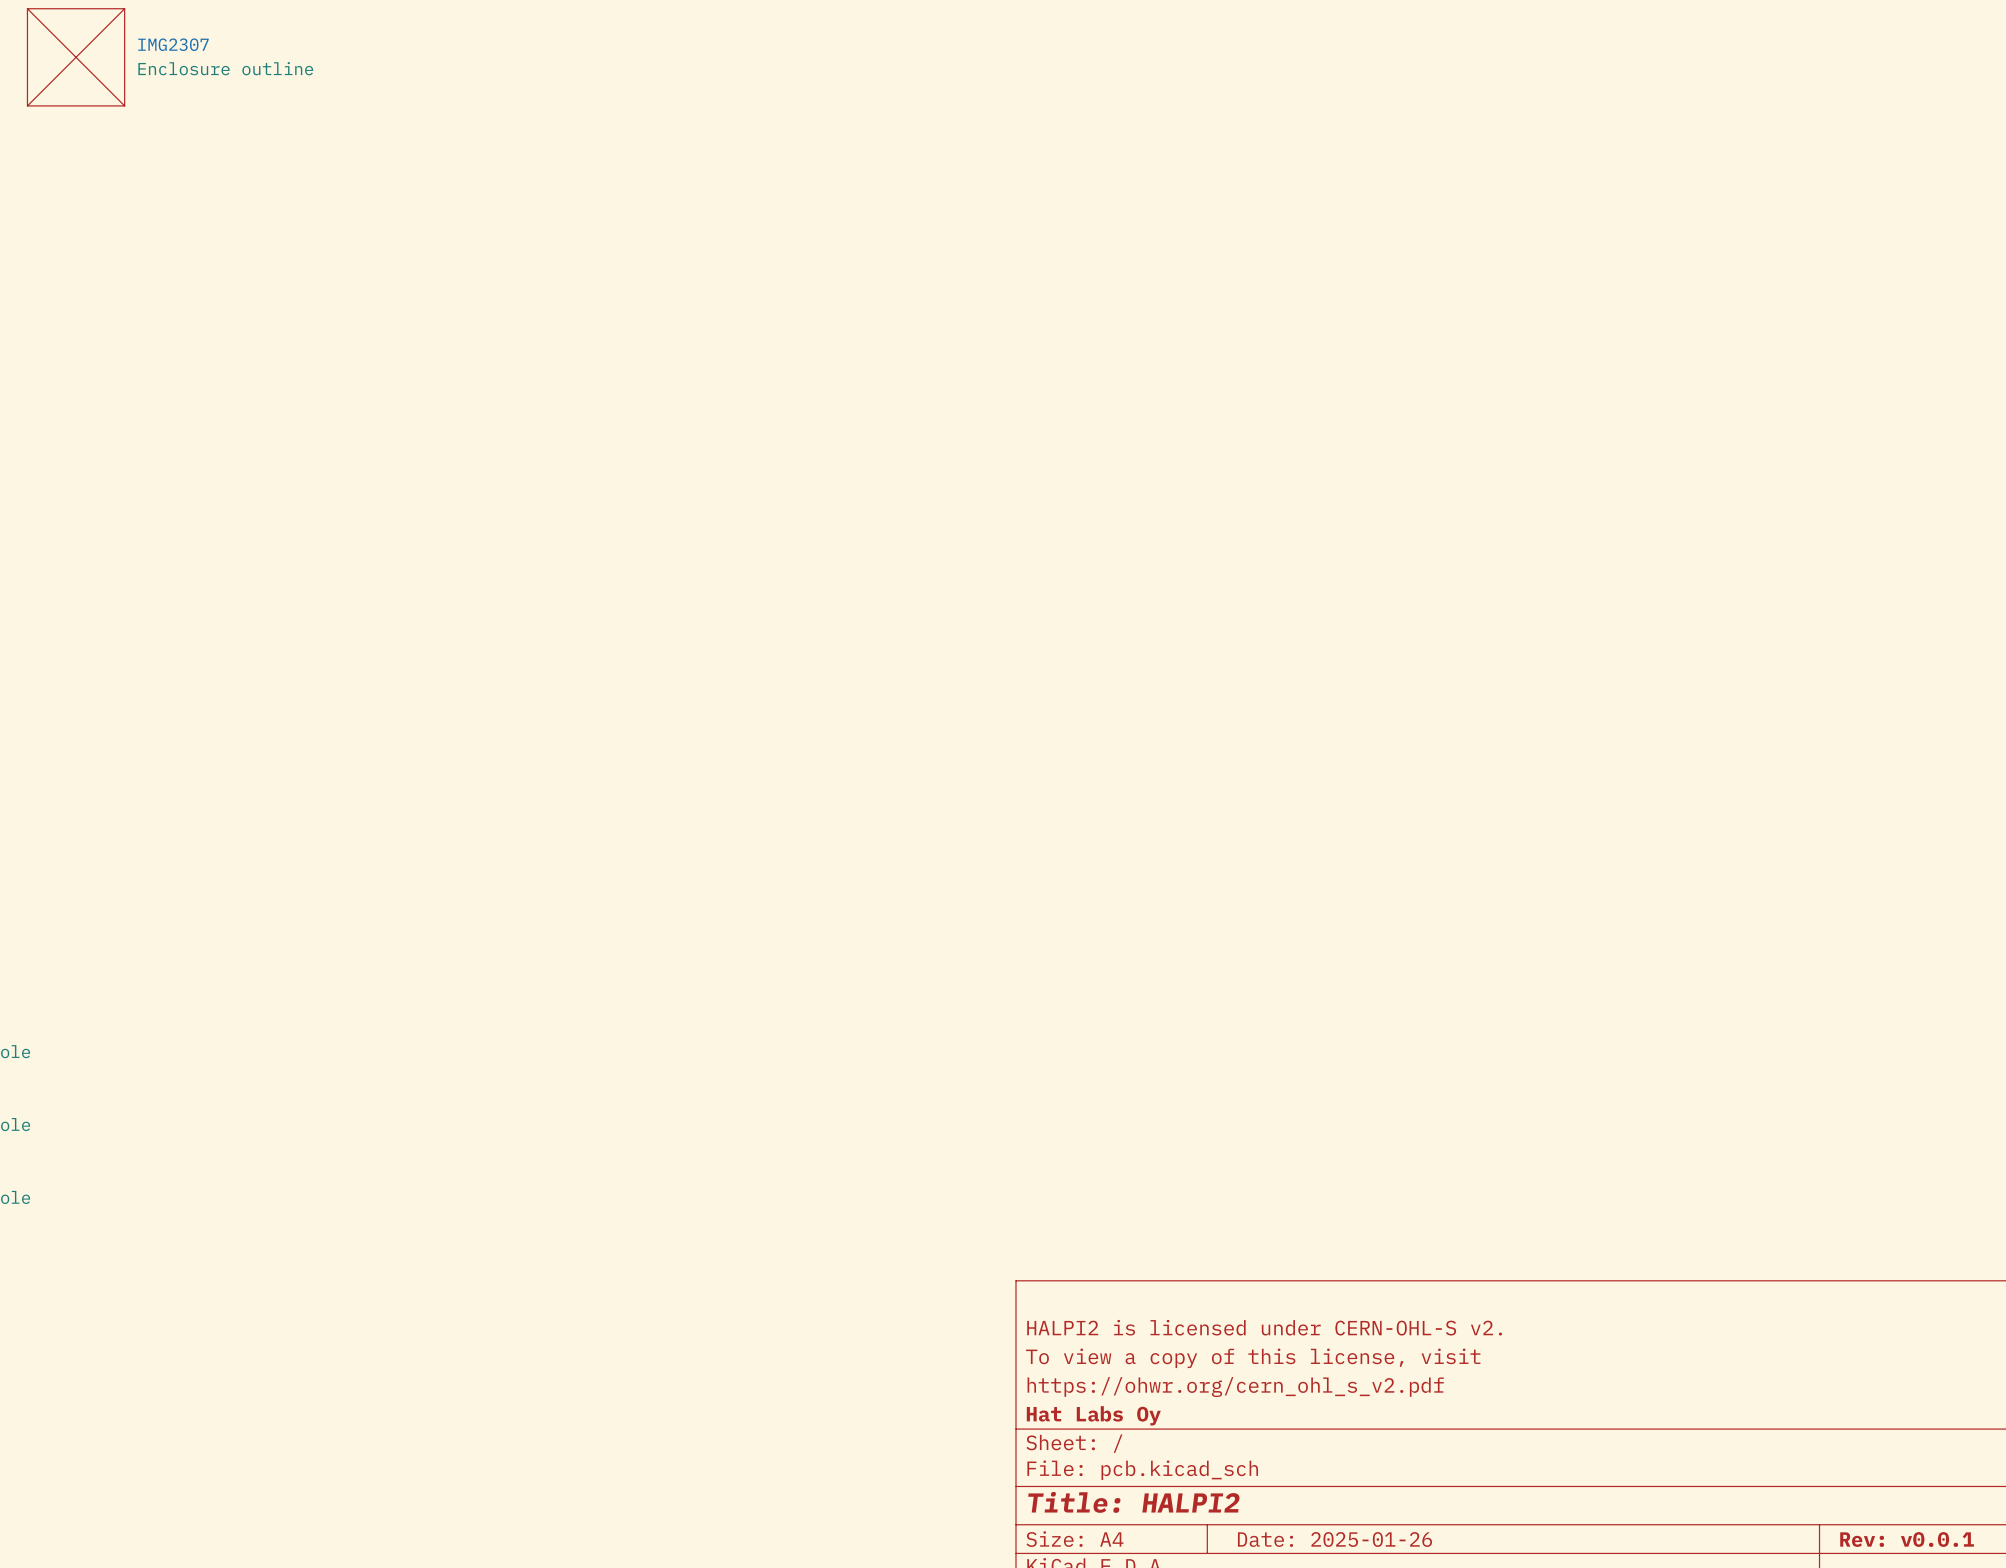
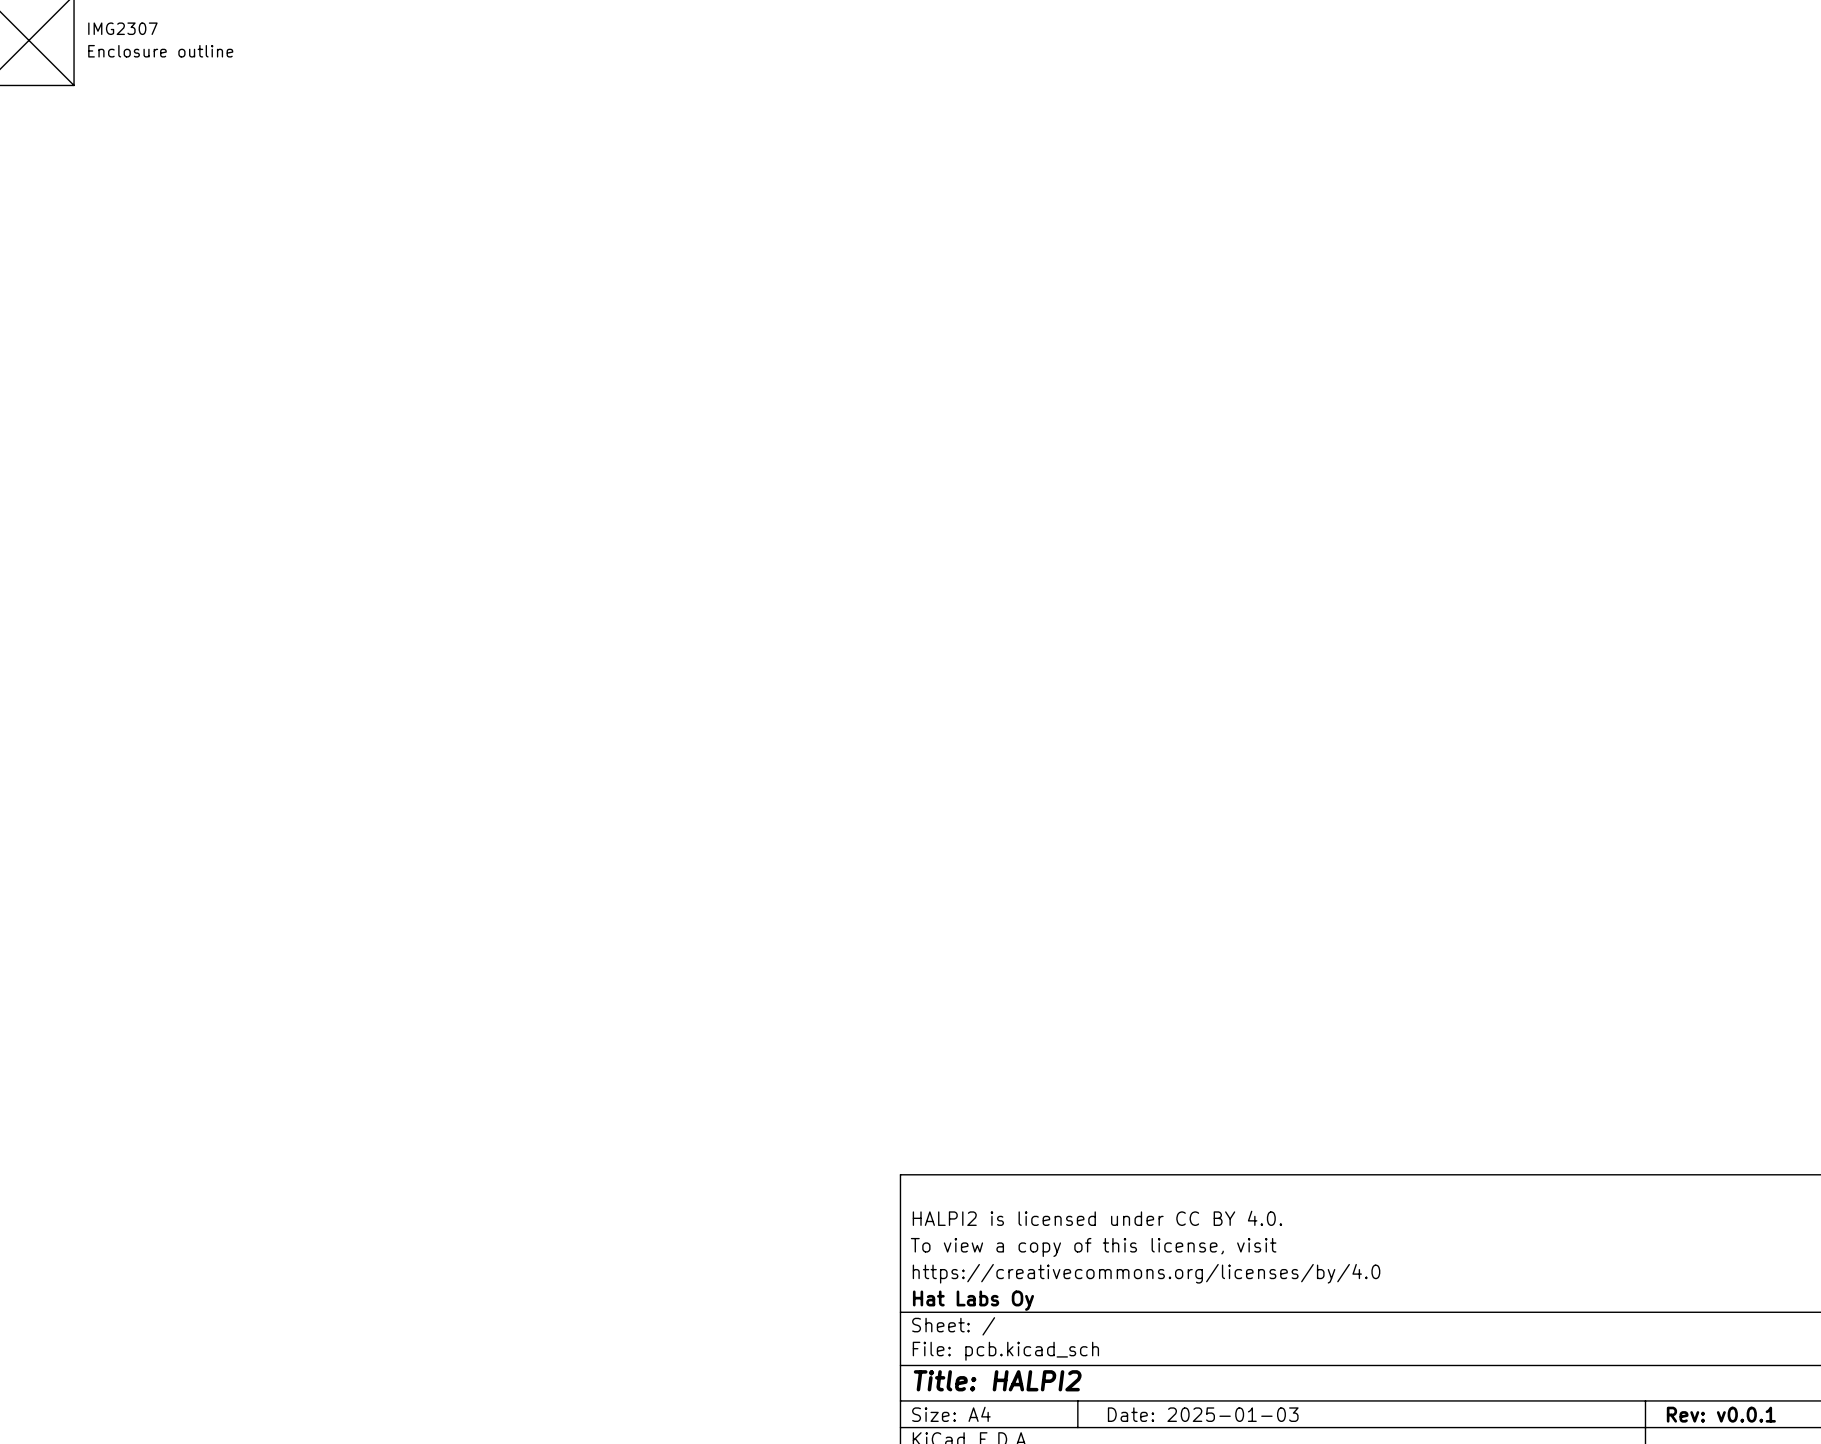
title block: HALPI2 is licensed under CERN-OHL-S v2. (1264, 1327) -> HALPI2 is licensed under CC BY 4.0. (1097, 1218)
title block: https://ohwr.org/cern_ohl_s_v2.pdf (1235, 1387) -> https://creativecommons.org/licenses/by/4.0 (1146, 1273)
title block: Date: 2025-01-26 (1335, 1539) -> Date: 2025-01-03 (1203, 1414)

